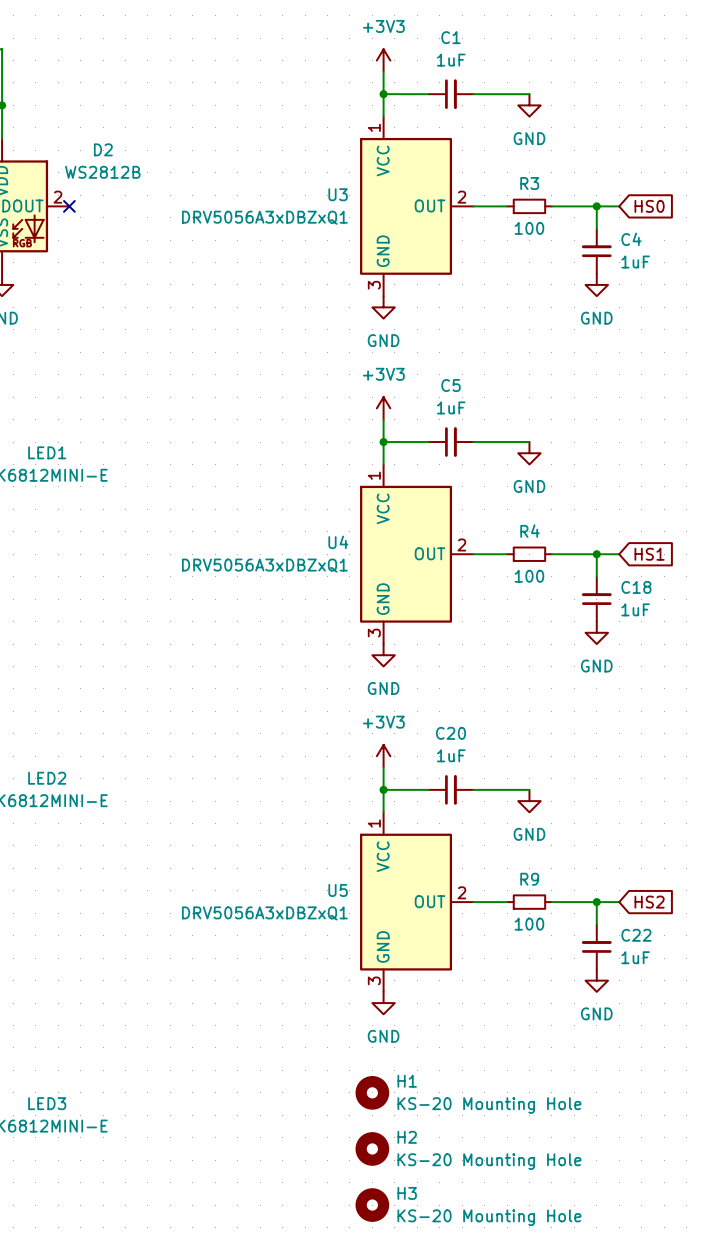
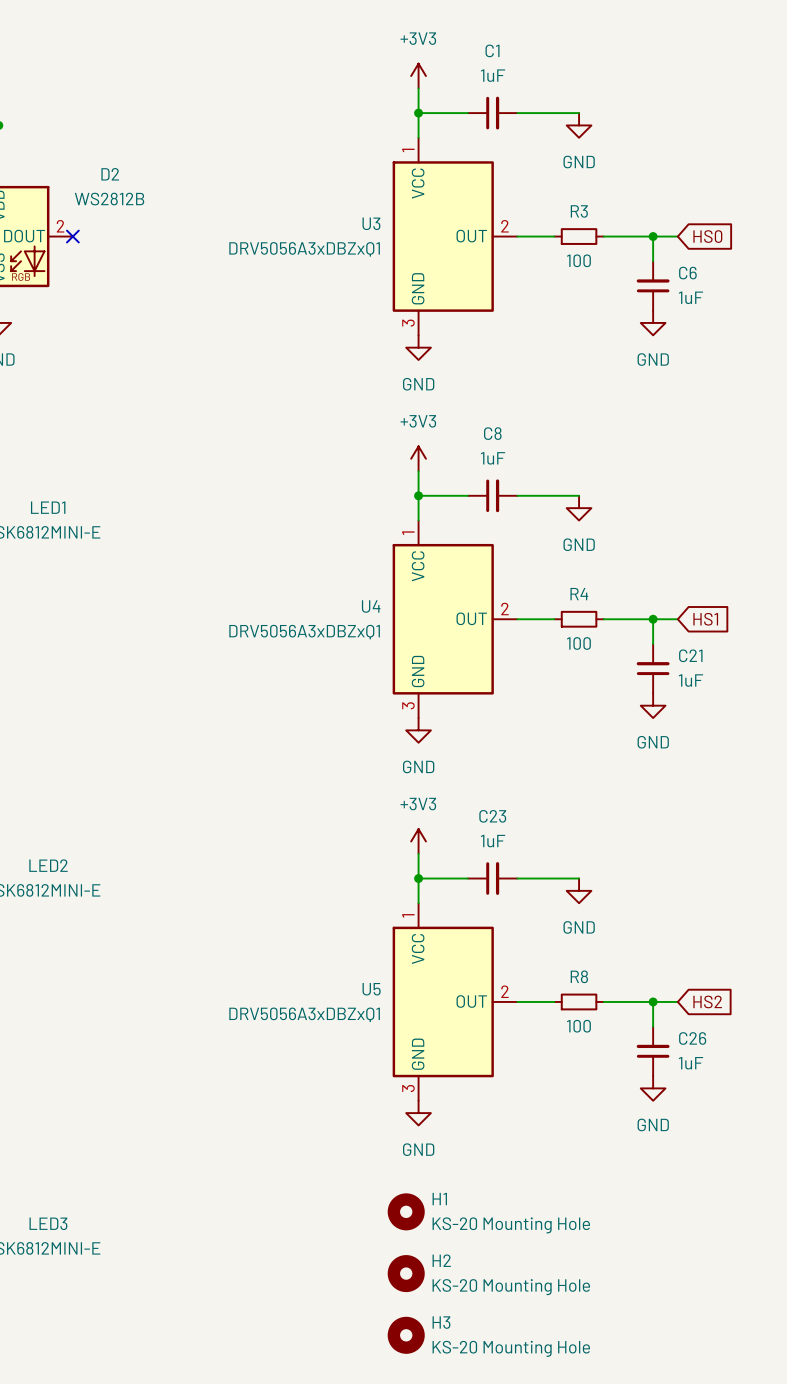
C4 name: C4 (631, 239) -> C6 (687, 273)
C5 name: C5 (450, 385) -> C8 (492, 433)
C18 name: C18 (636, 587) -> C21 (690, 655)
C20 name: C20 (450, 733) -> C23 (492, 816)
R9 name: R9 (529, 879) -> R8 (579, 976)
C22 name: C22 (636, 935) -> C26 (692, 1038)

